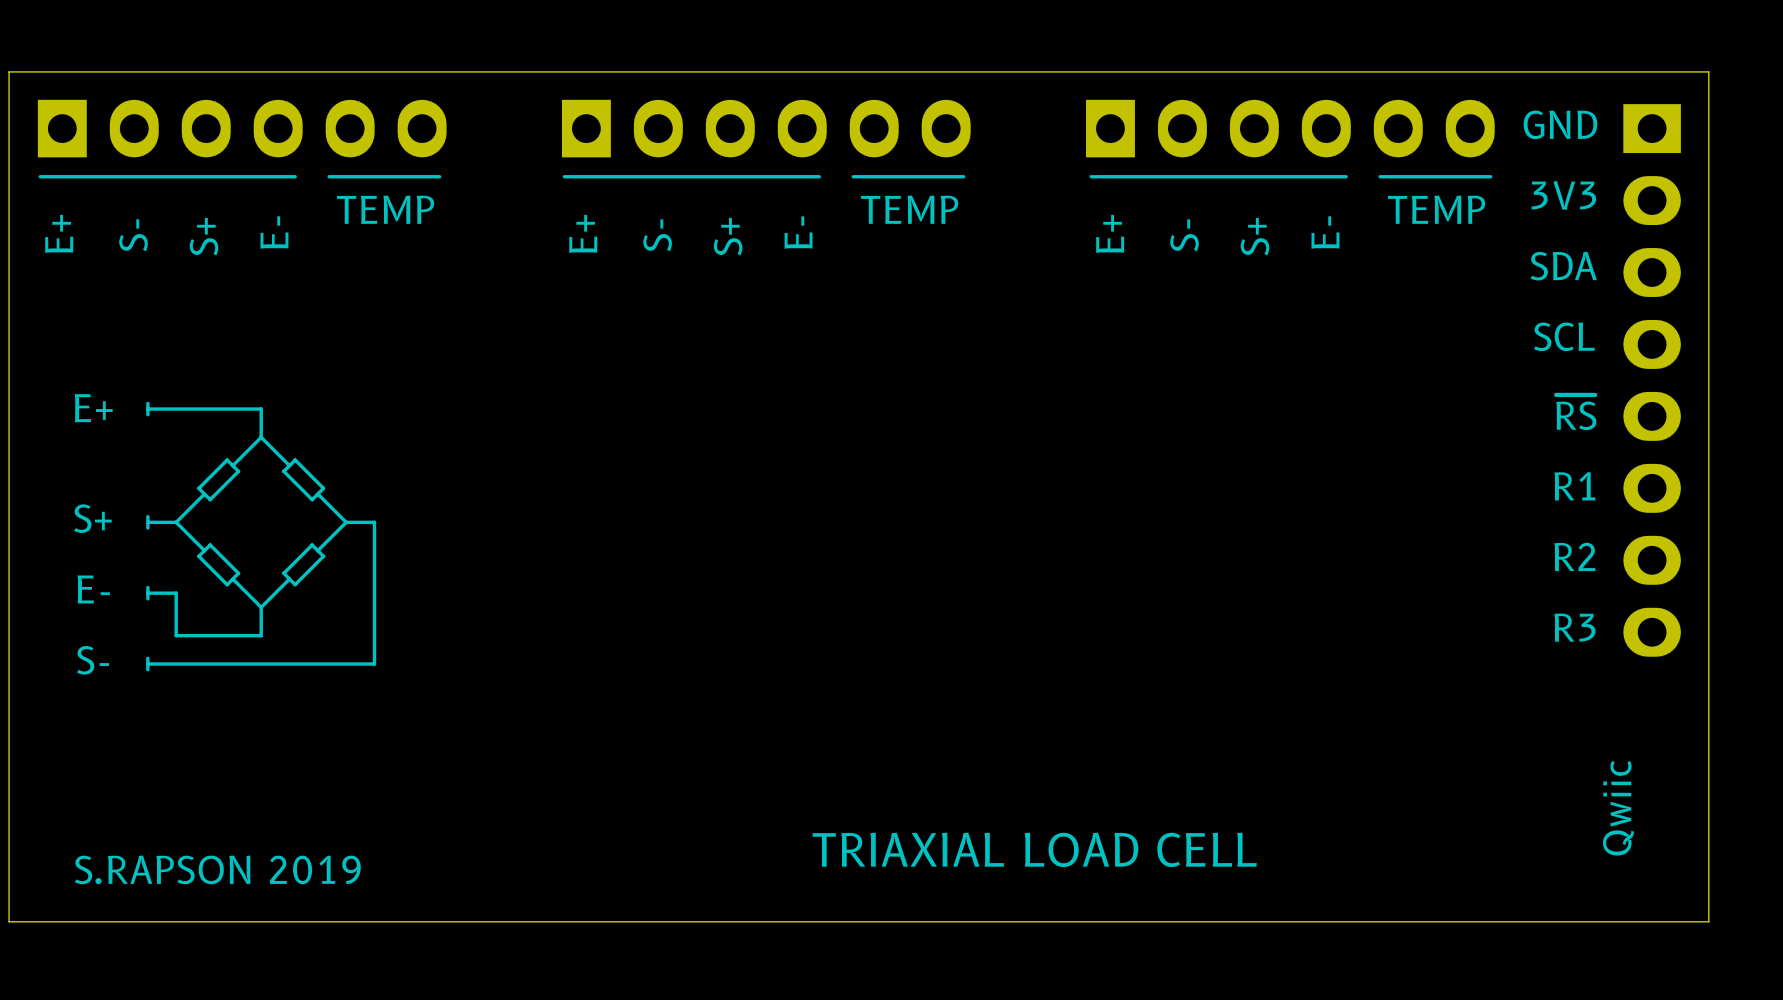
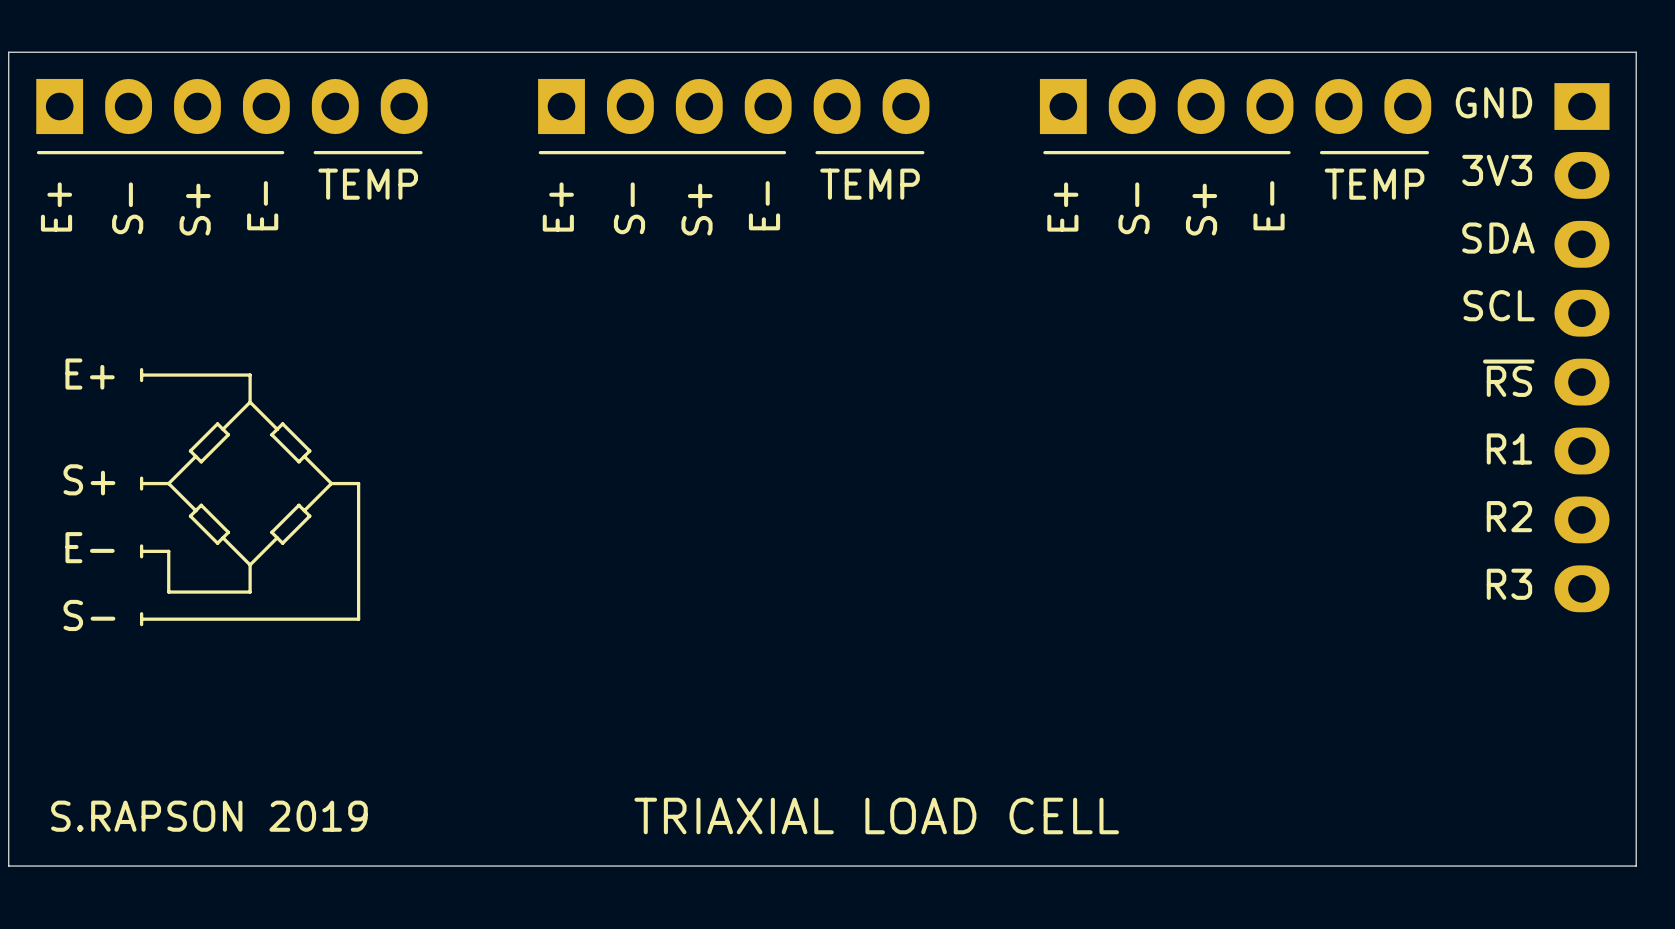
text: Qwiic (1618, 808) -> none
text position: TRIAXIAL LOAD CELL (1034, 849) -> TRIAXIAL LOAD CELL (876, 815)

